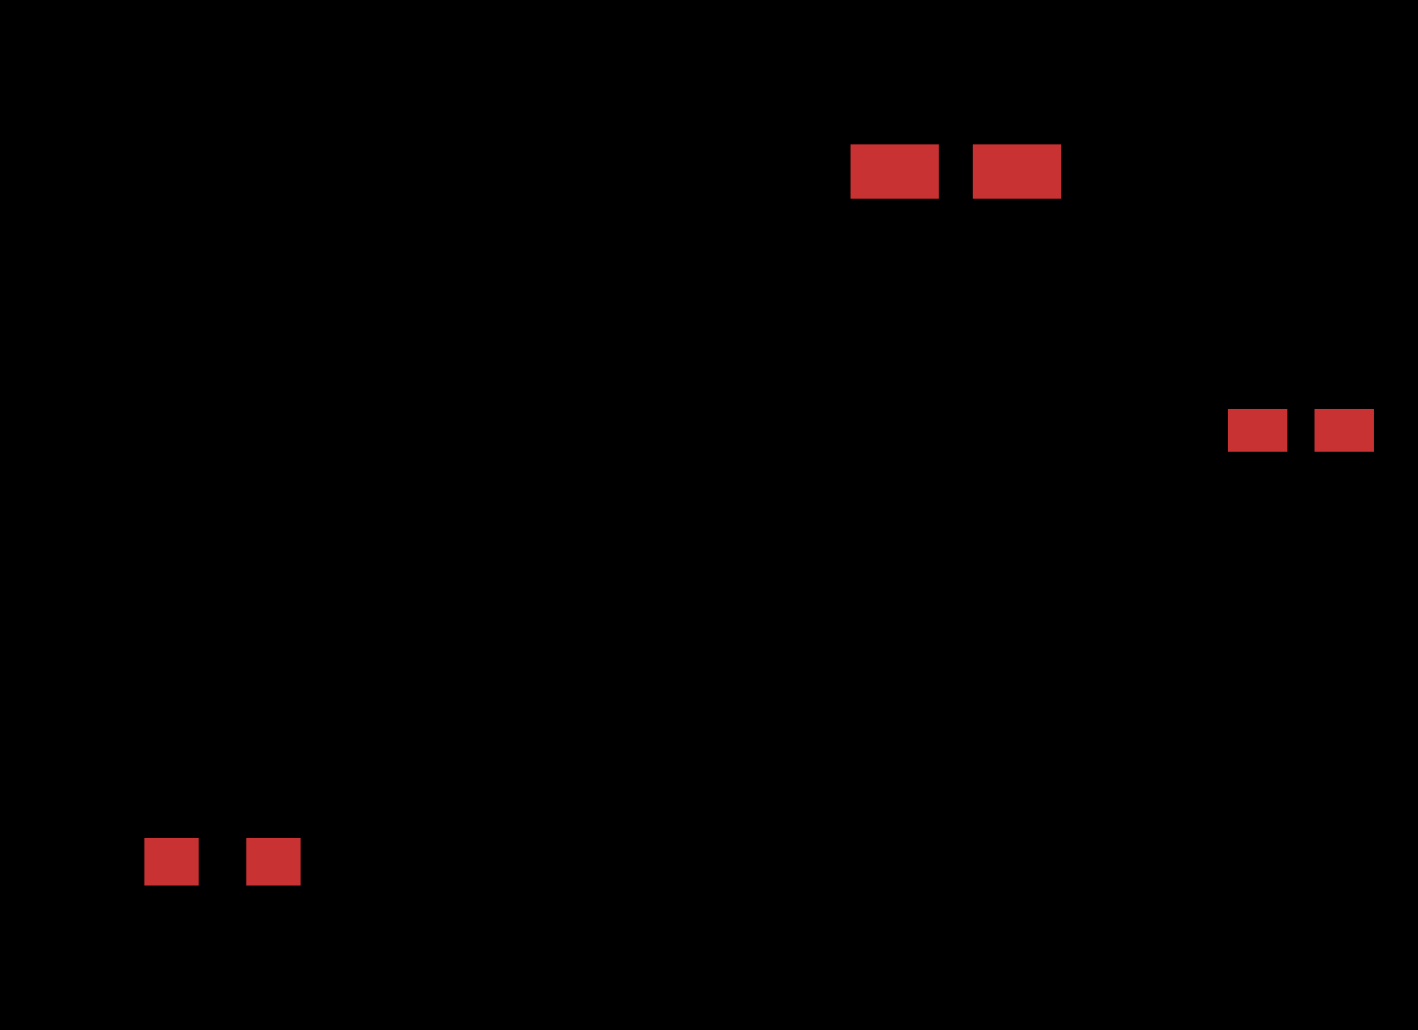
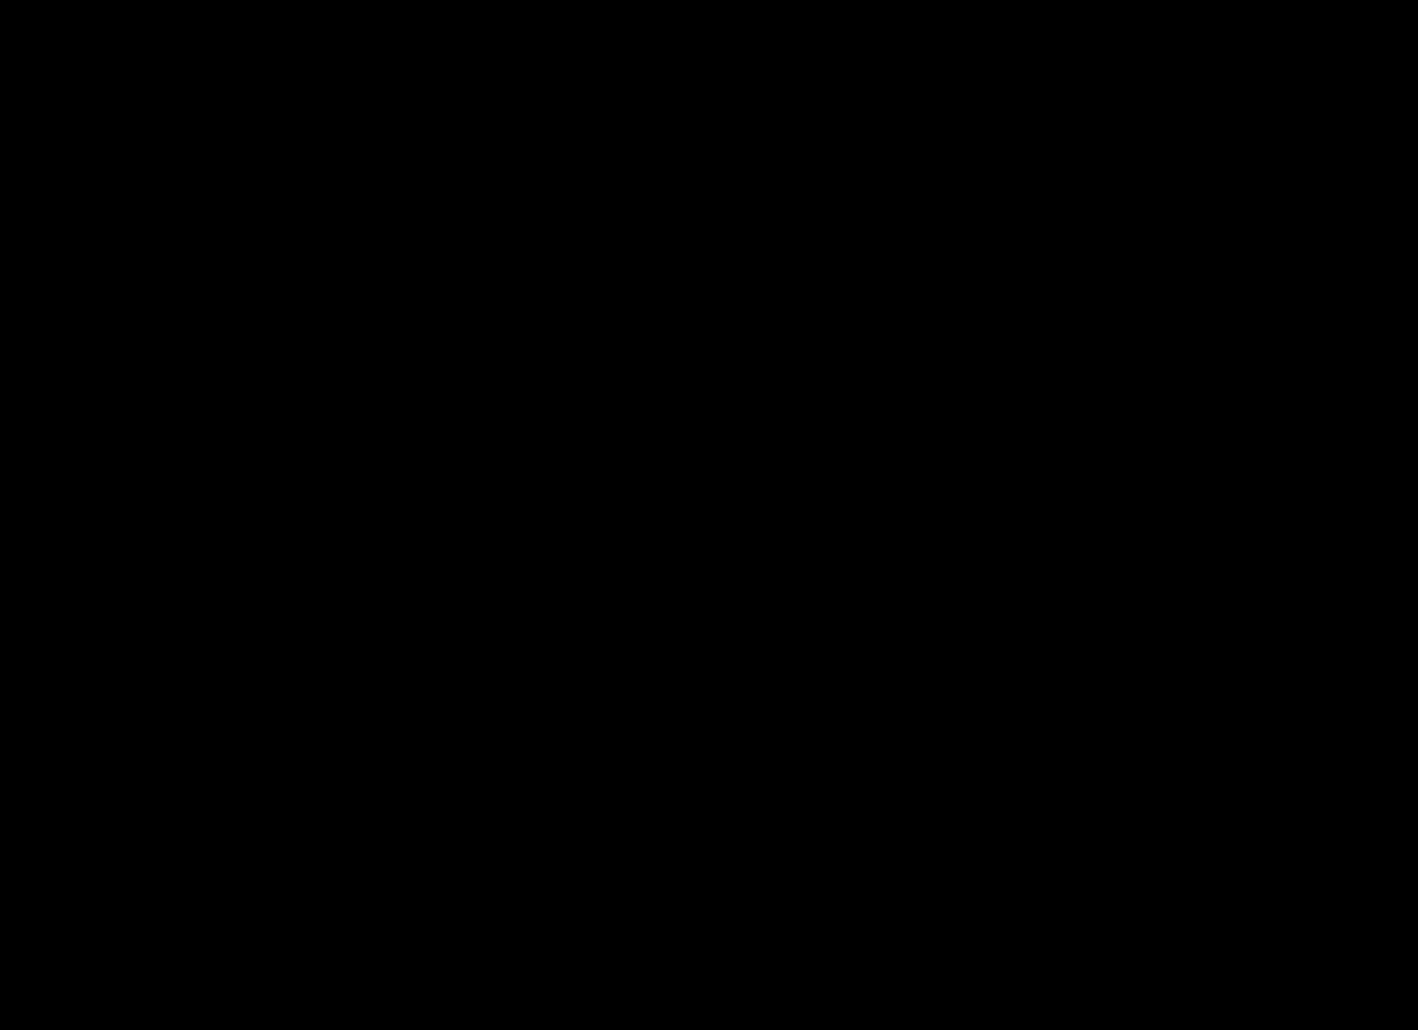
part: (955, 171) -> none
part: (1300, 430) -> none
part: (222, 861) -> none

